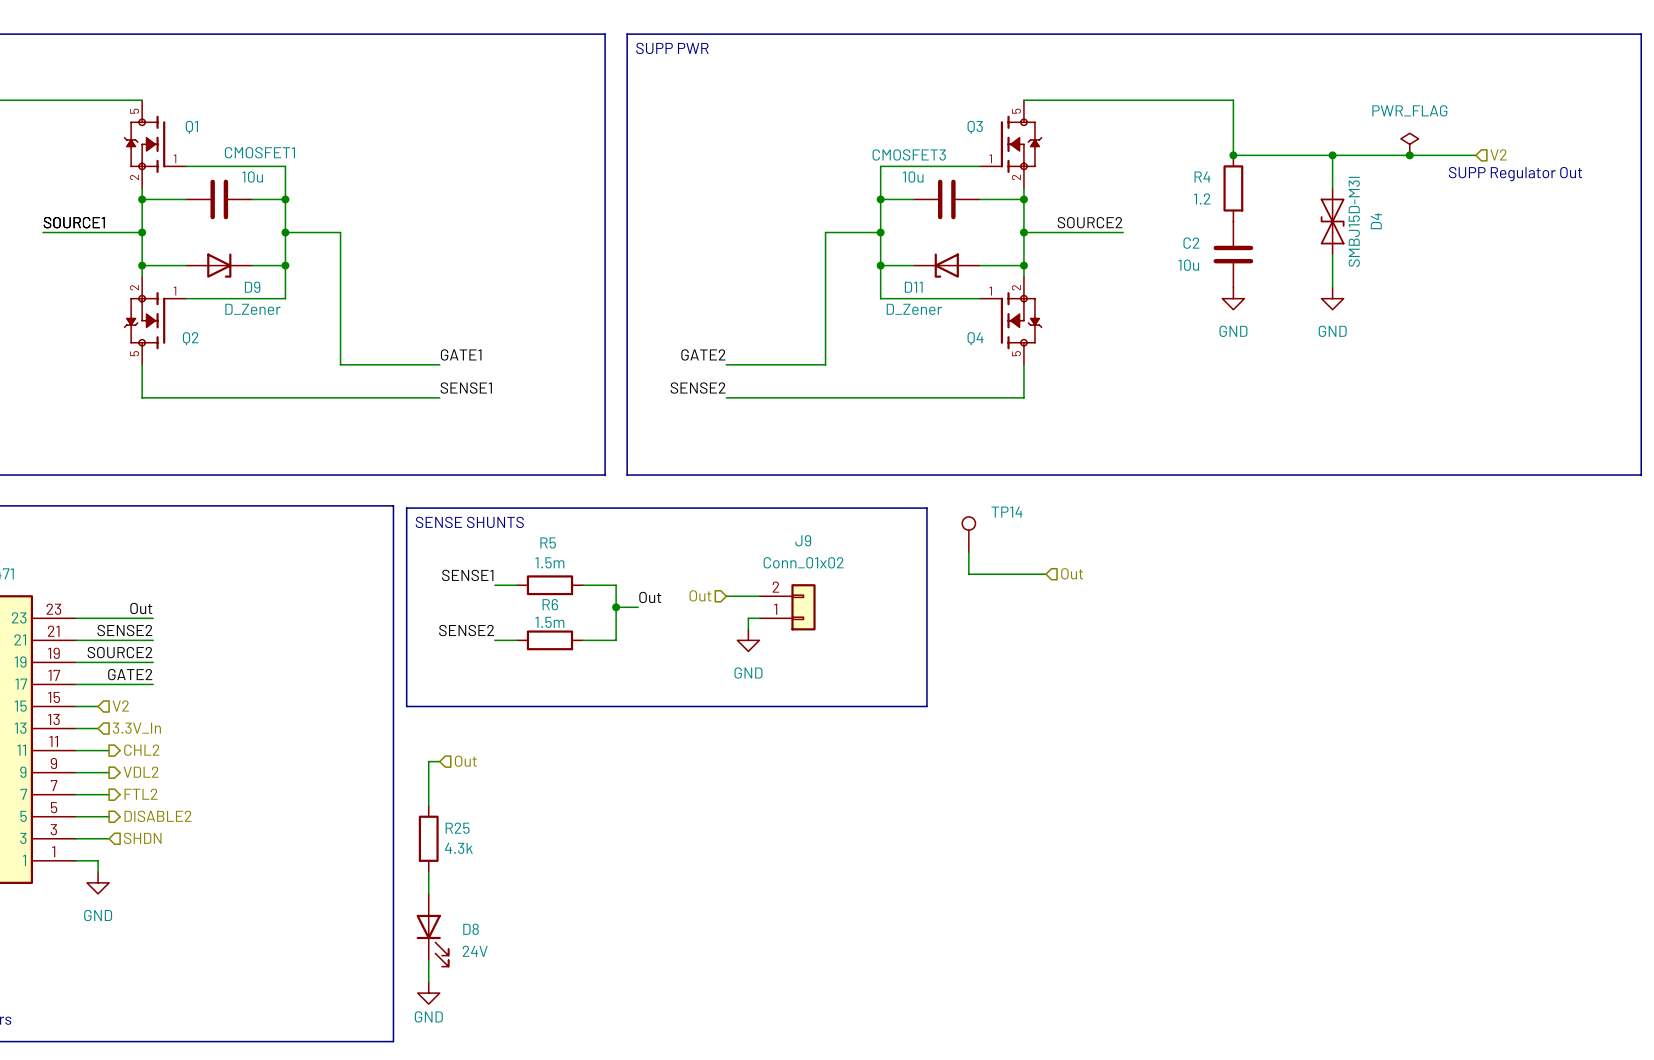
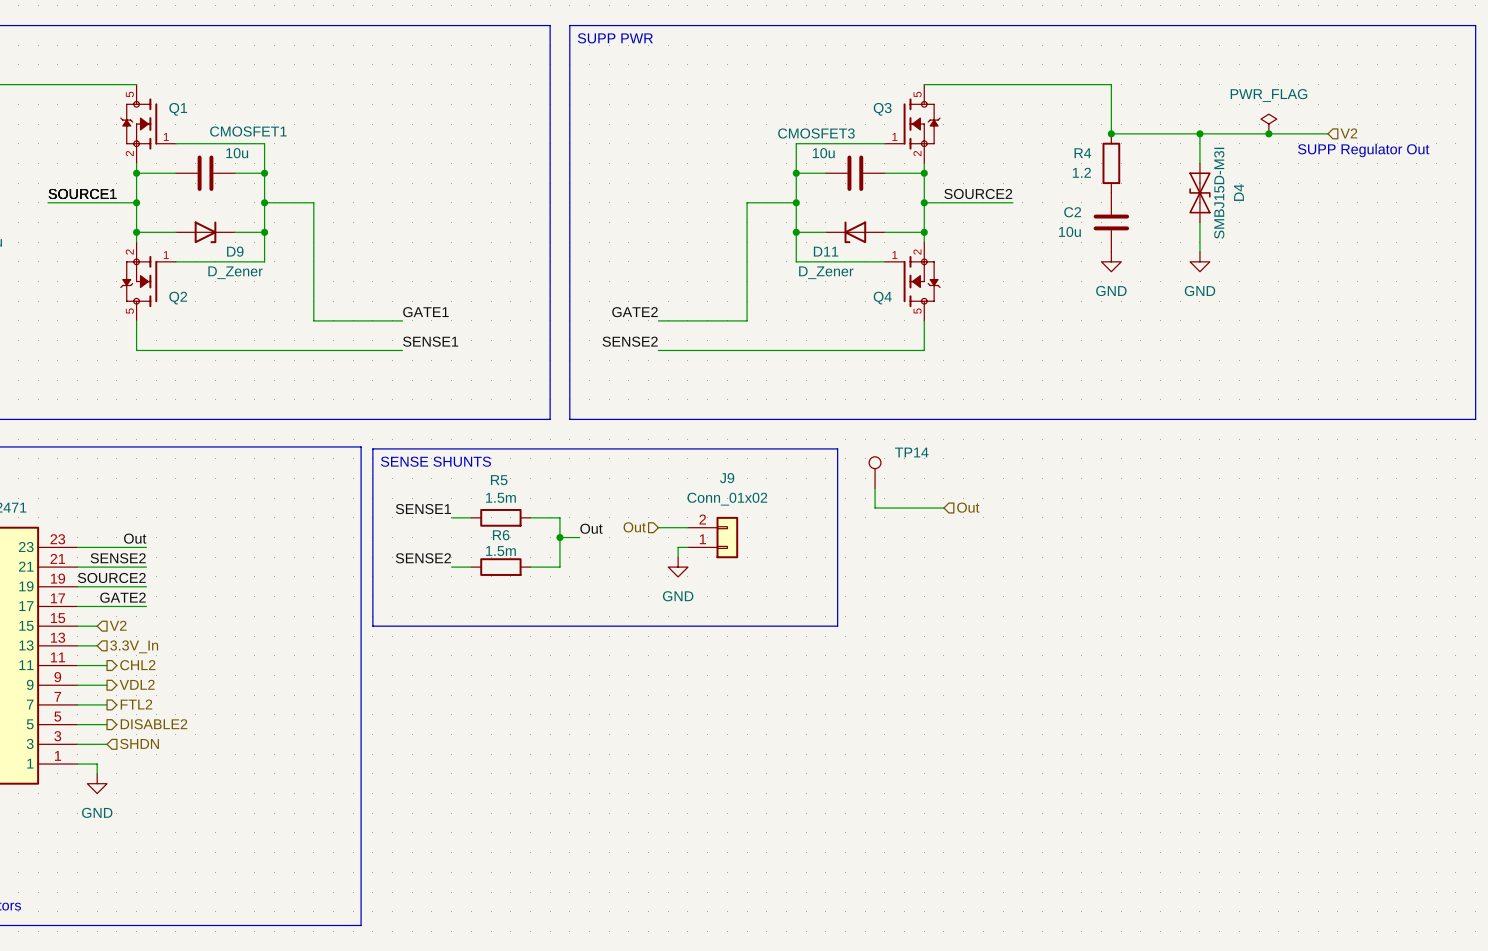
wire: (439, 761) (428, 761) (428, 805) -> none
hierarchical label: Out (465, 761) -> none
R25: 4.3k (428, 838) -> none
wire: (428, 871) (428, 893) -> none
D8: 24V (432, 930) -> none
wire: (428, 960) (428, 982) -> none
power symbol: GND (428, 993) -> none

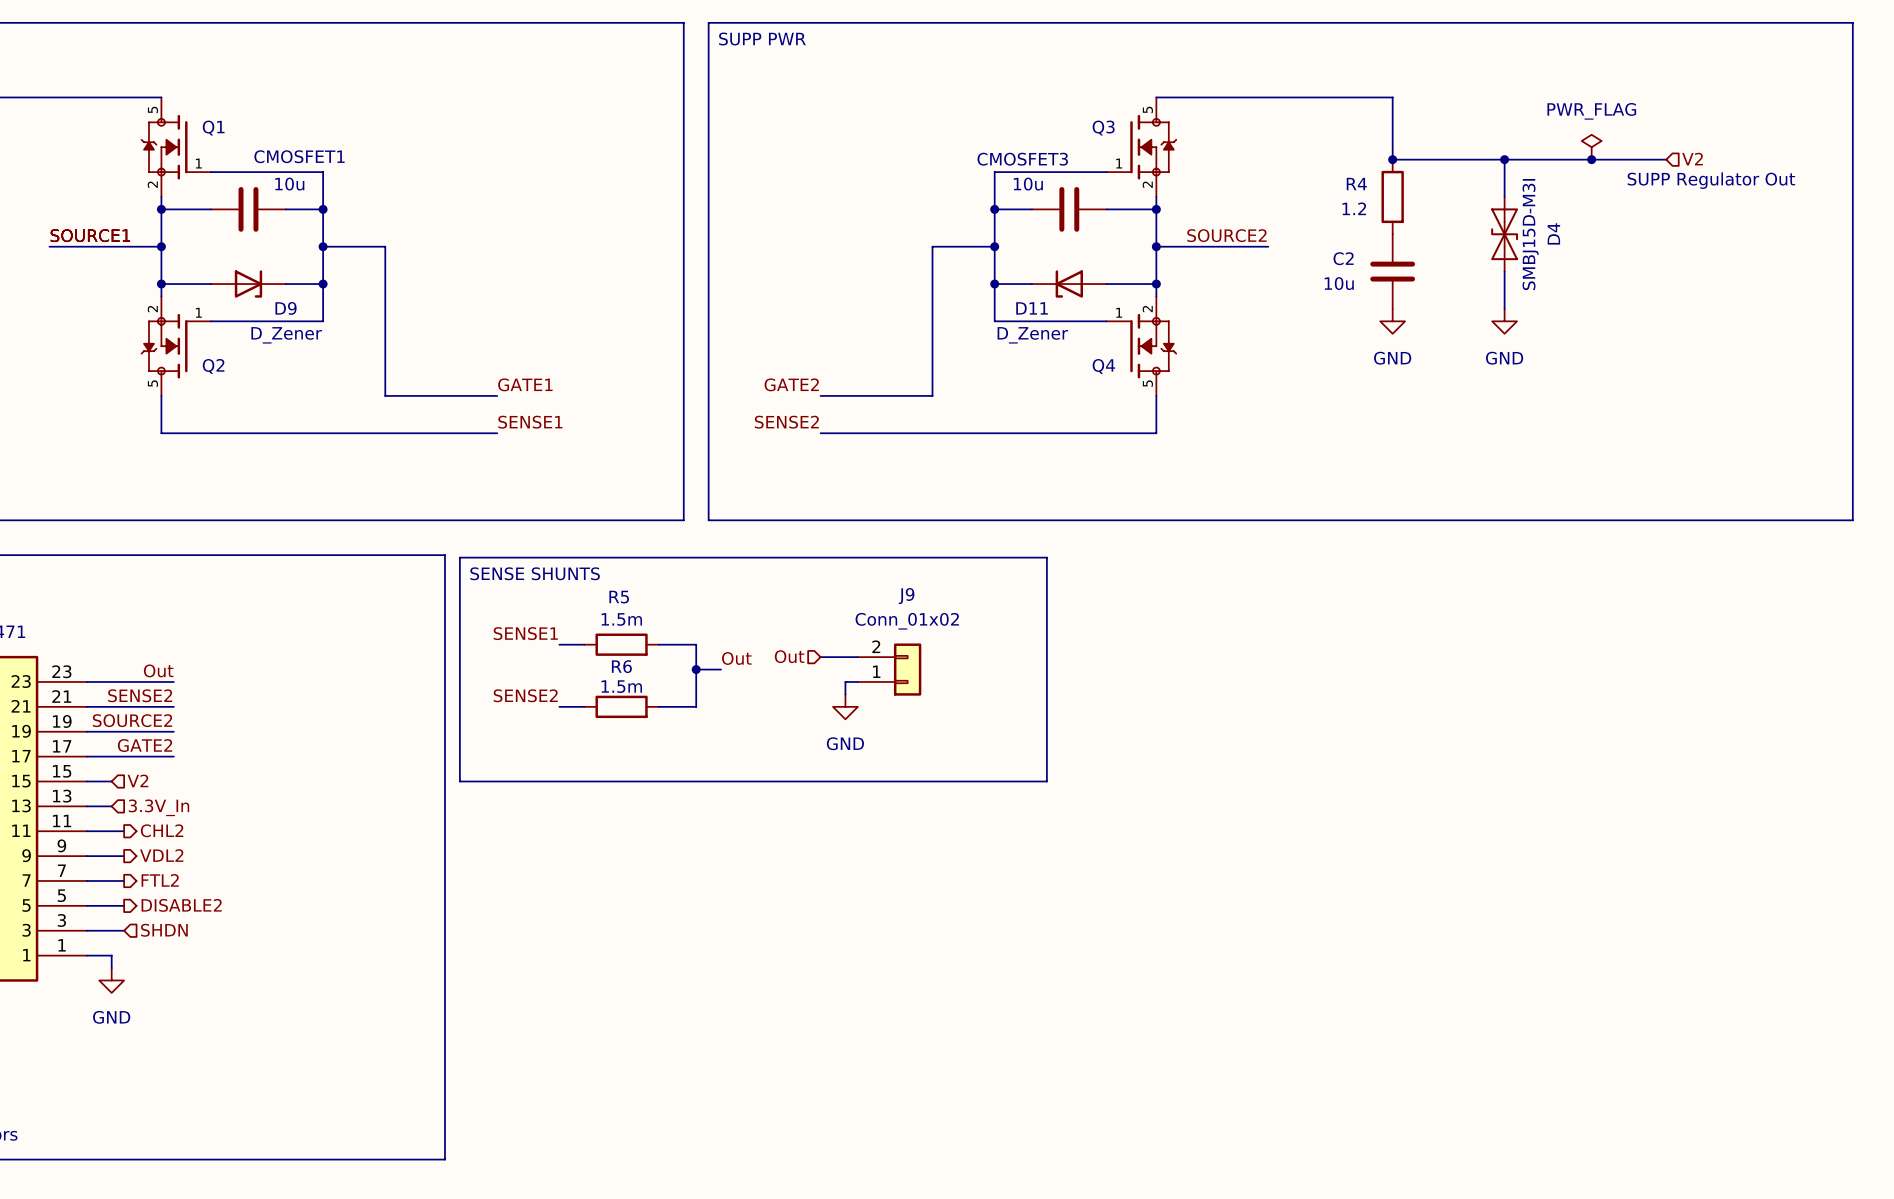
TP14: (875, 472) -> none
wire: (875, 488) (875, 508) (943, 508) -> none
hierarchical label: Out (968, 507) -> none

